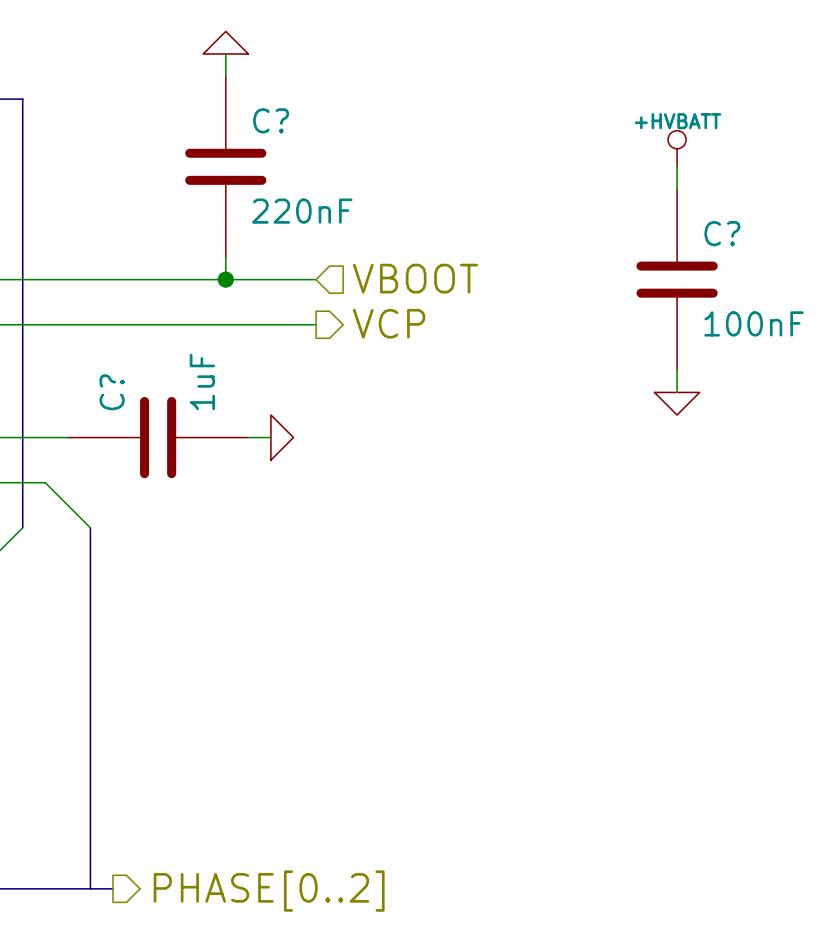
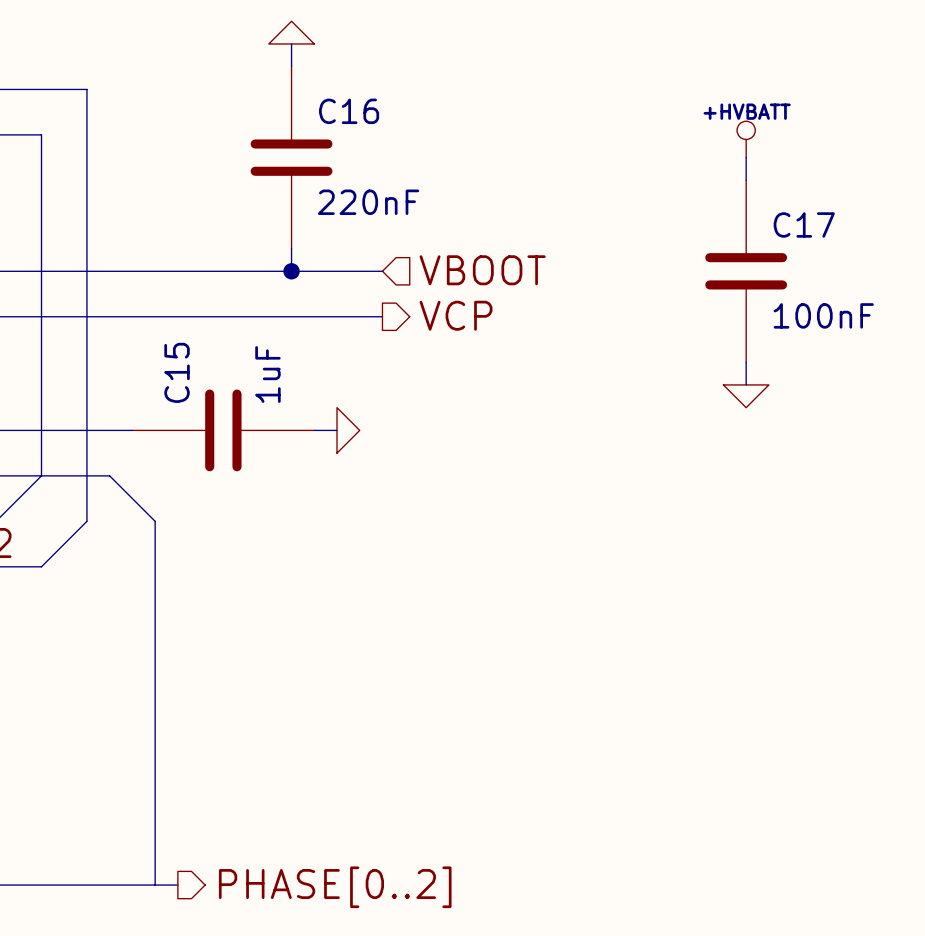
C? name: C? (271, 120) -> C16 (349, 111)
C? name: C? (722, 233) -> C17 (804, 224)
C? name: C? (112, 392) -> C15 (177, 372)

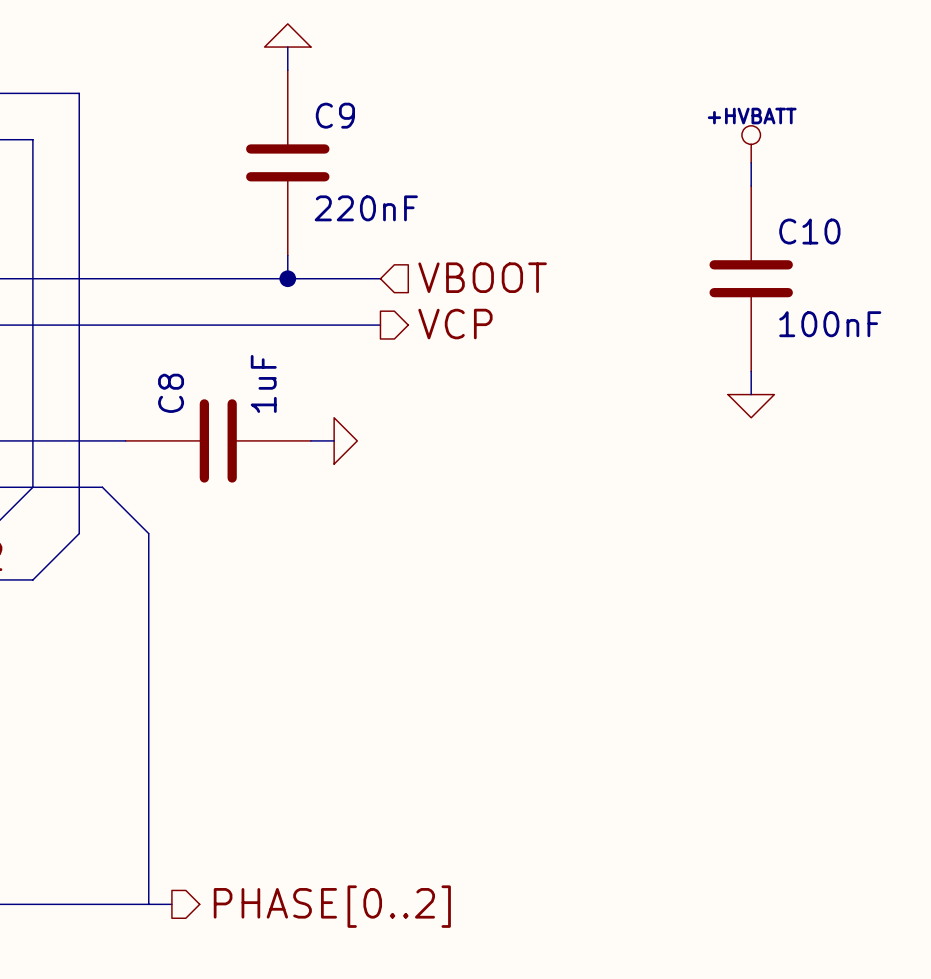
C16 name: C16 (349, 111) -> C9 (335, 115)
C17 name: C17 (804, 224) -> C10 (809, 231)
C15 name: C15 (177, 372) -> C8 (171, 393)

